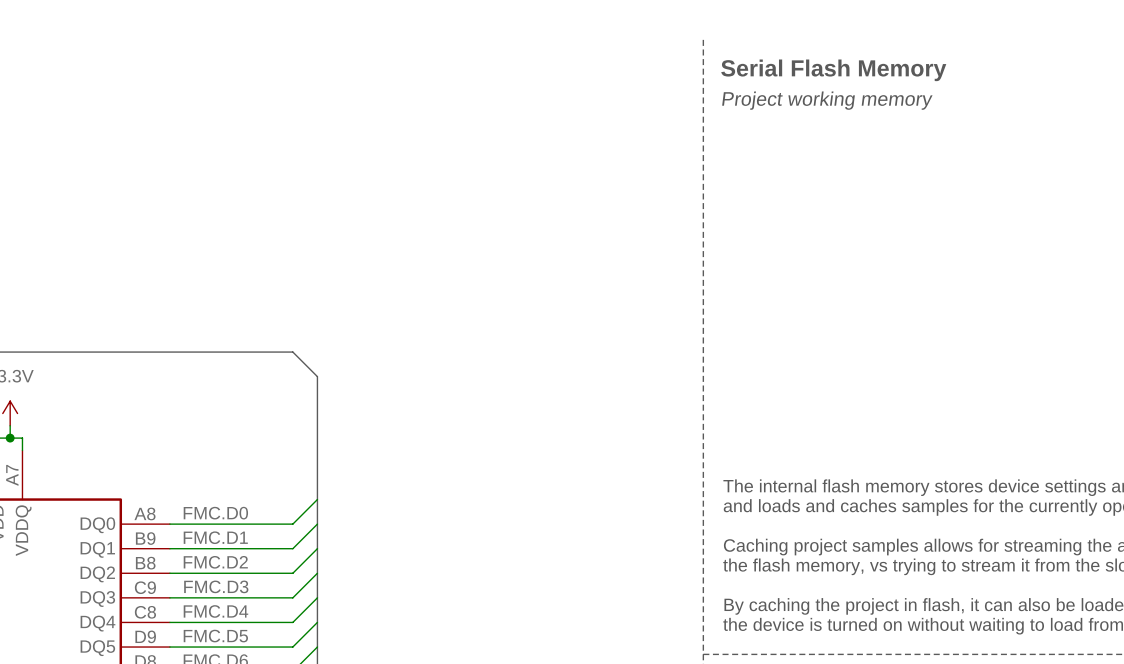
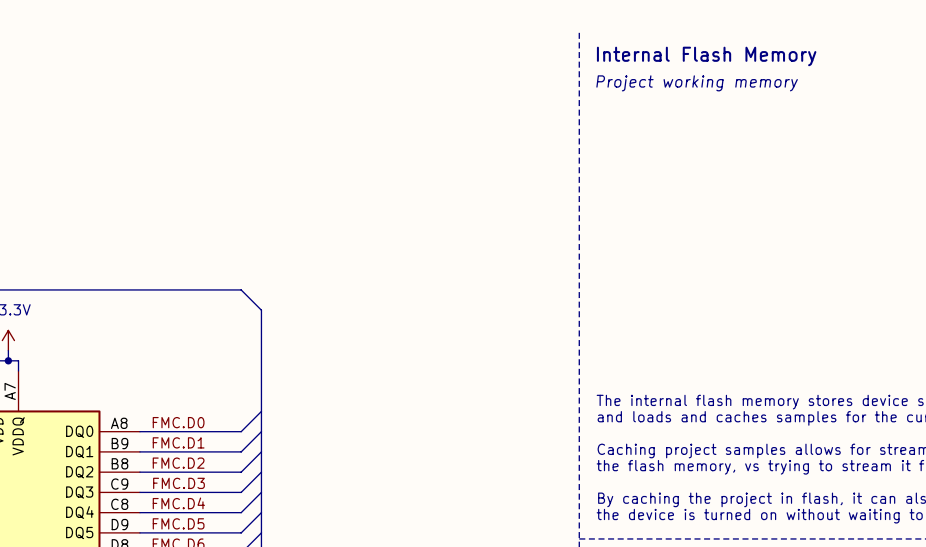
text: Serial Flash Memory (833, 70) -> Internal Flash Memory (706, 56)

